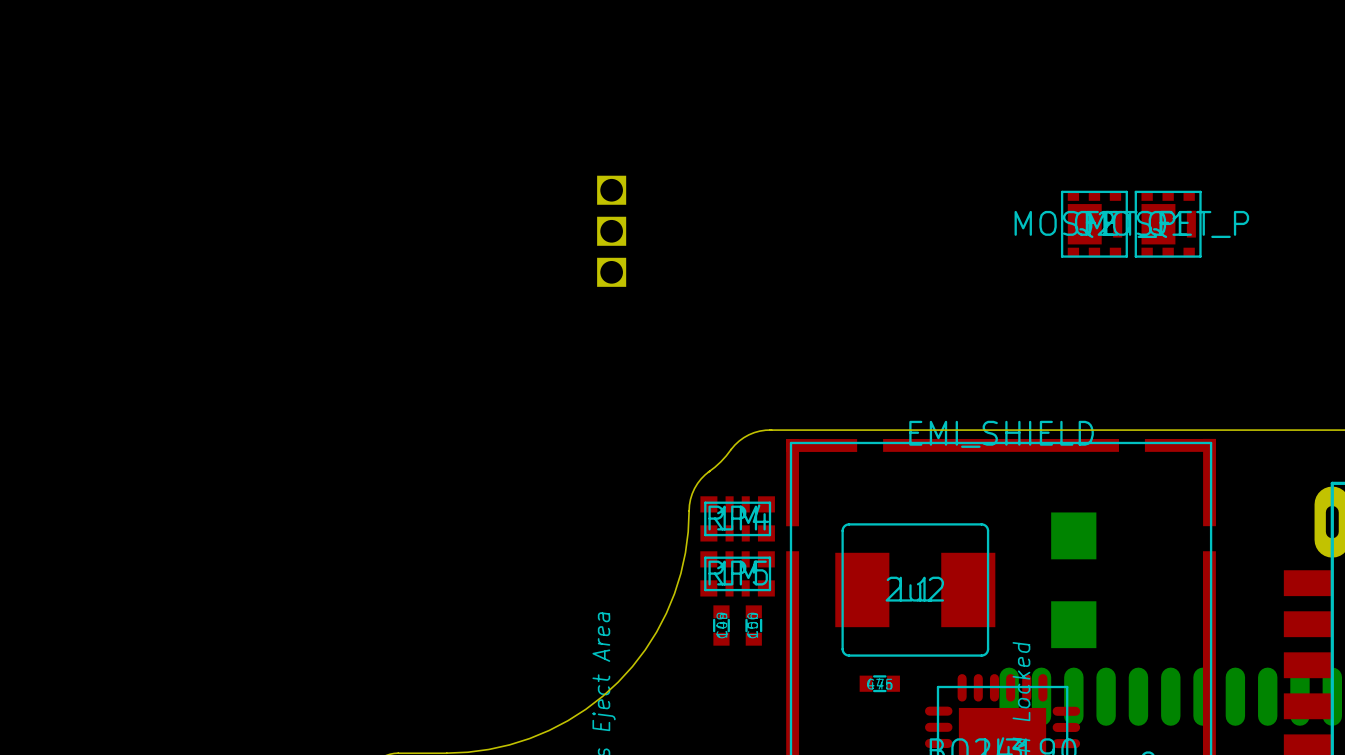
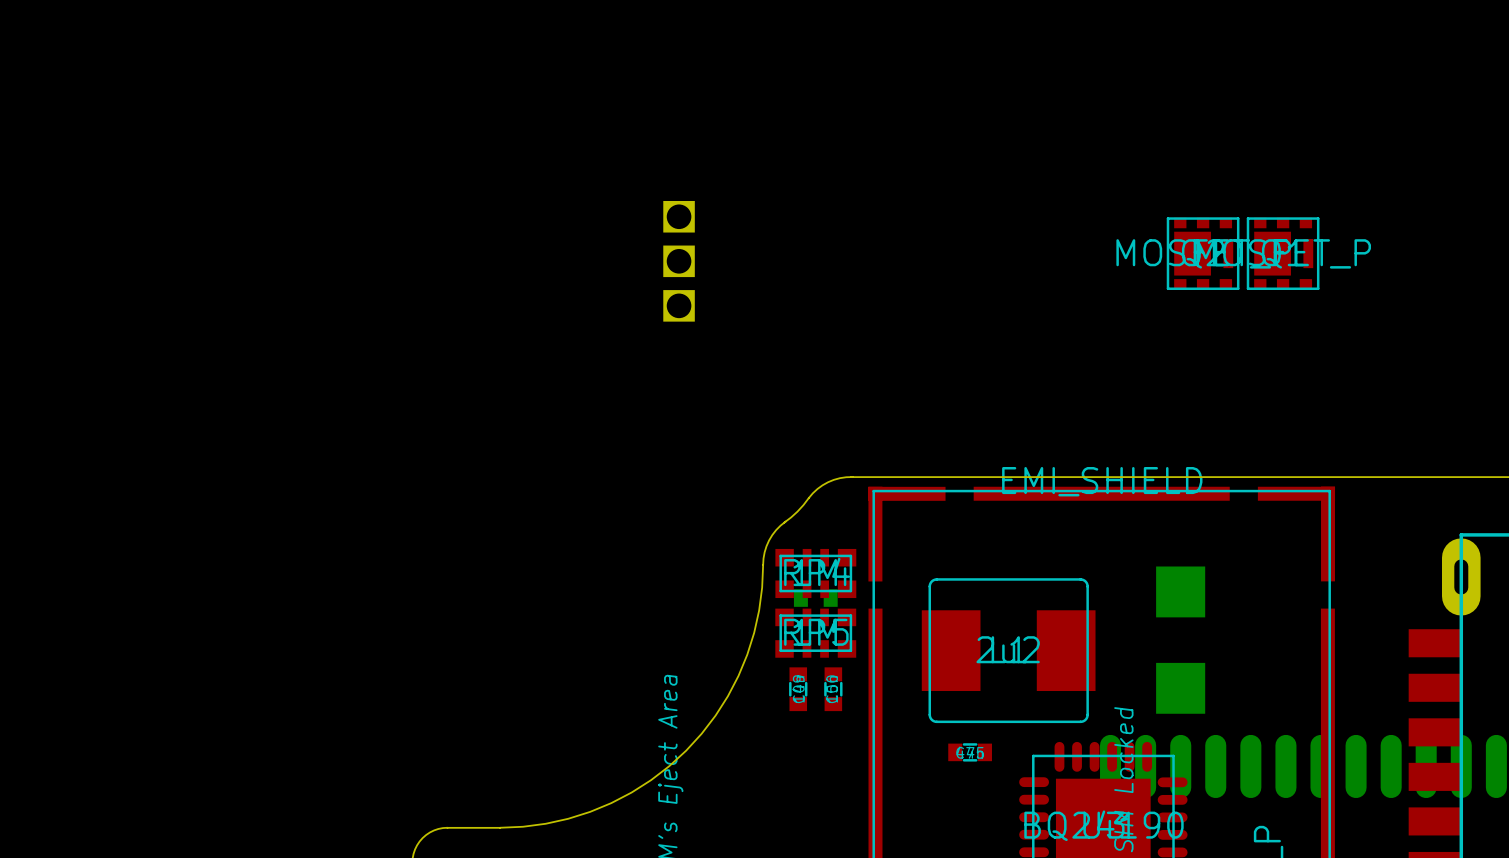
part: none -> (815, 598)

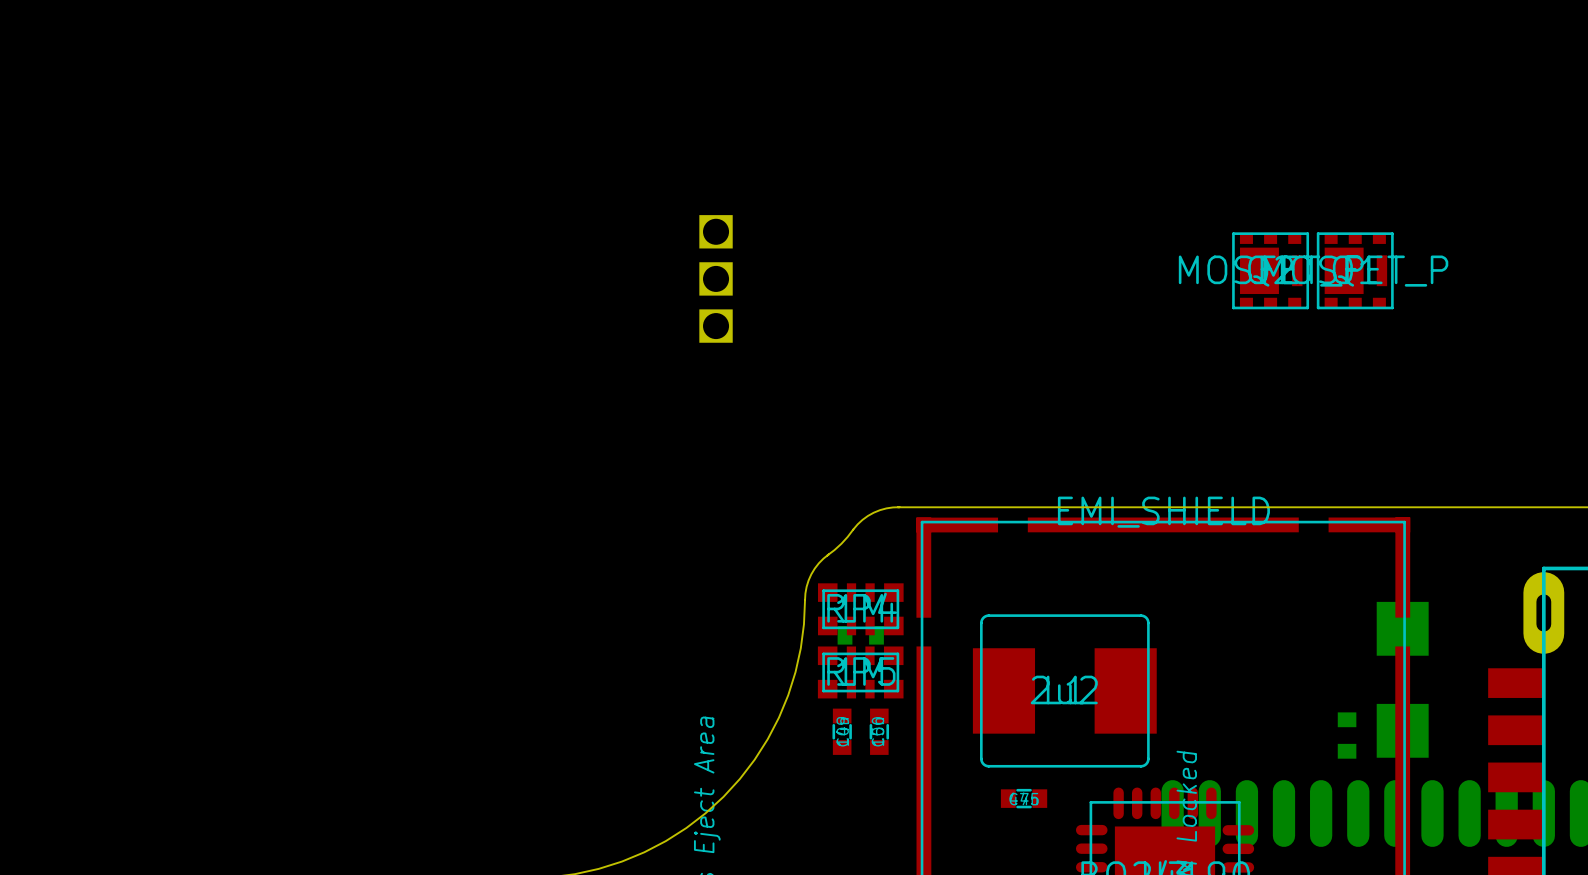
part position: (1180, 640) -> (1402, 679)
part: none -> (1347, 735)

